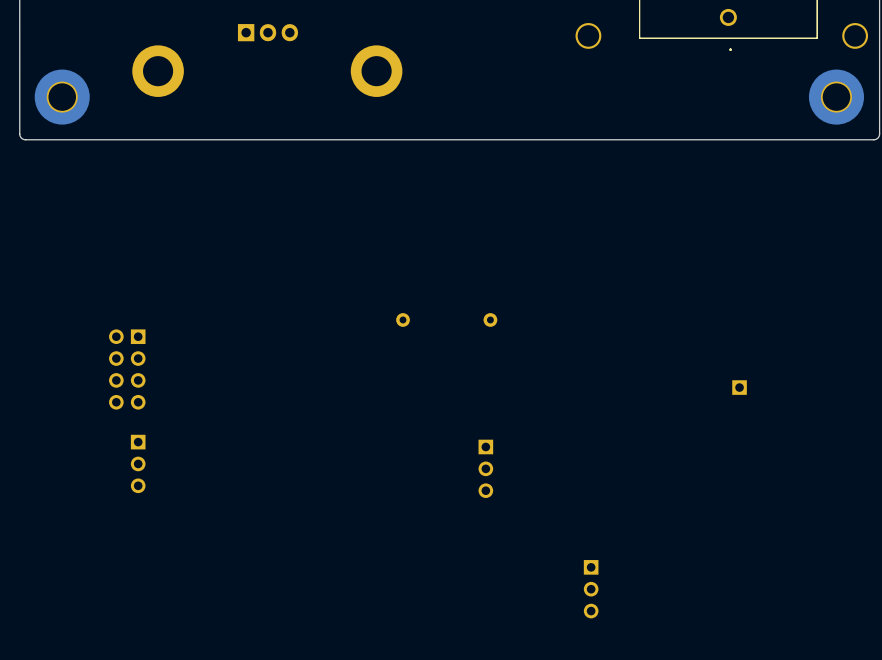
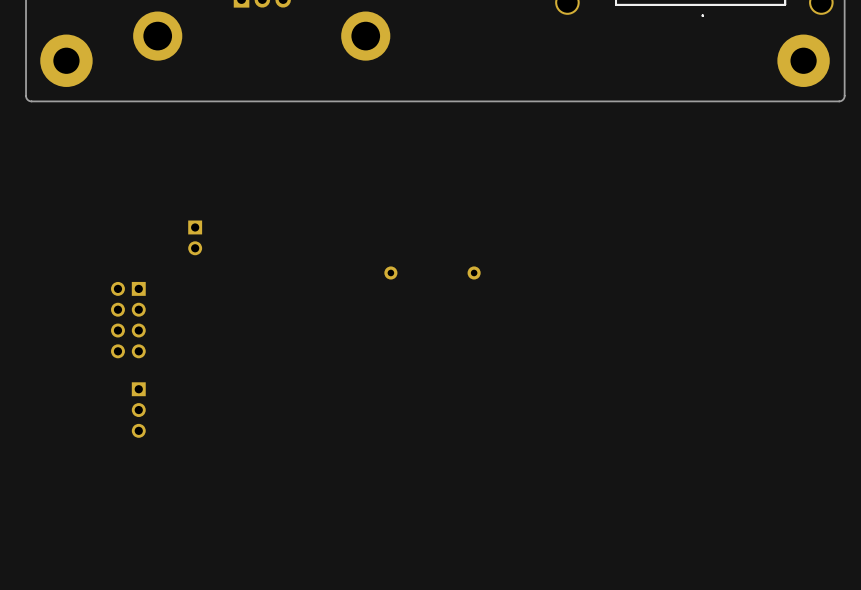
part: none -> (195, 237)
part: (739, 387) -> none
part: (485, 468) -> none
part: (591, 589) -> none

